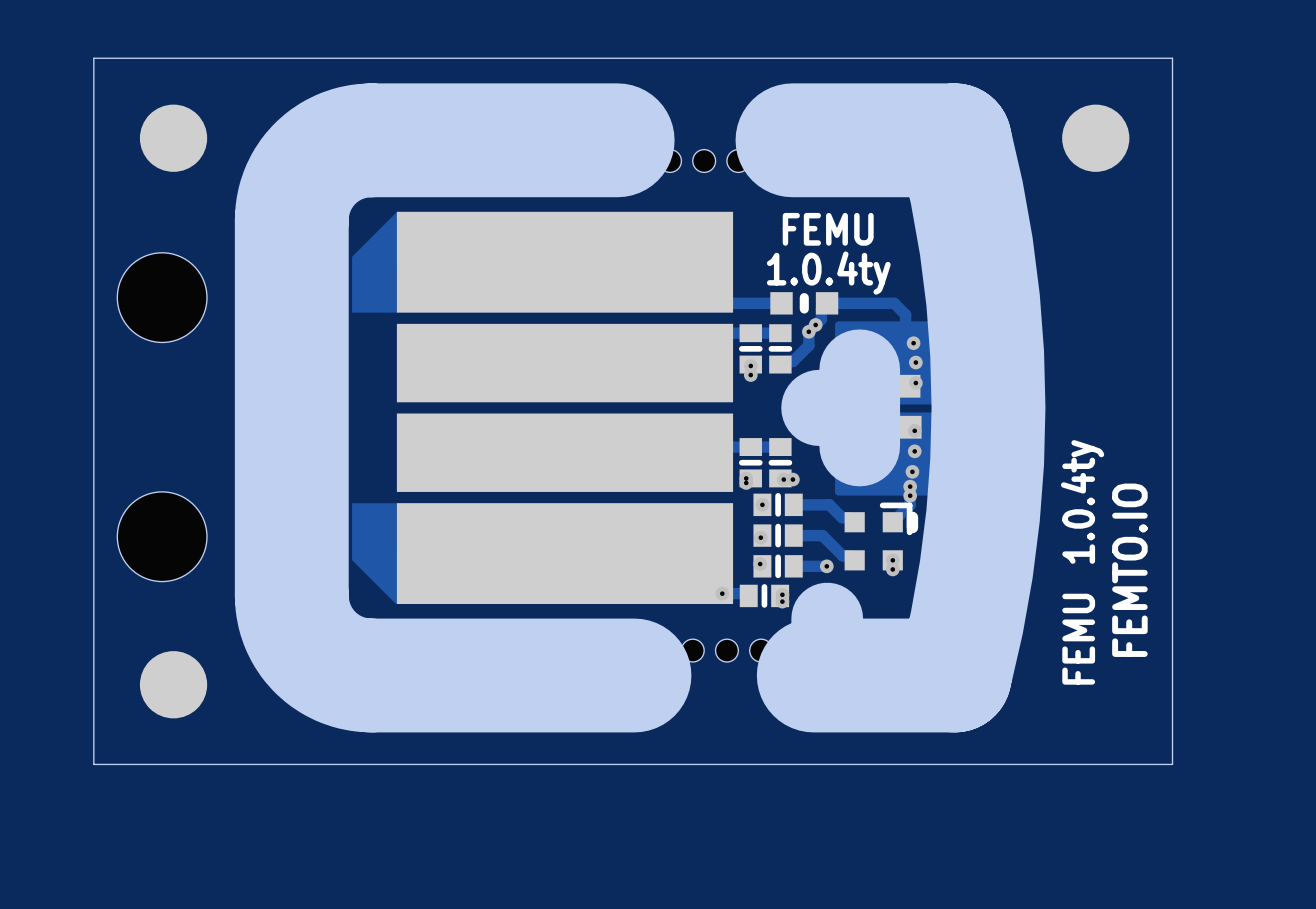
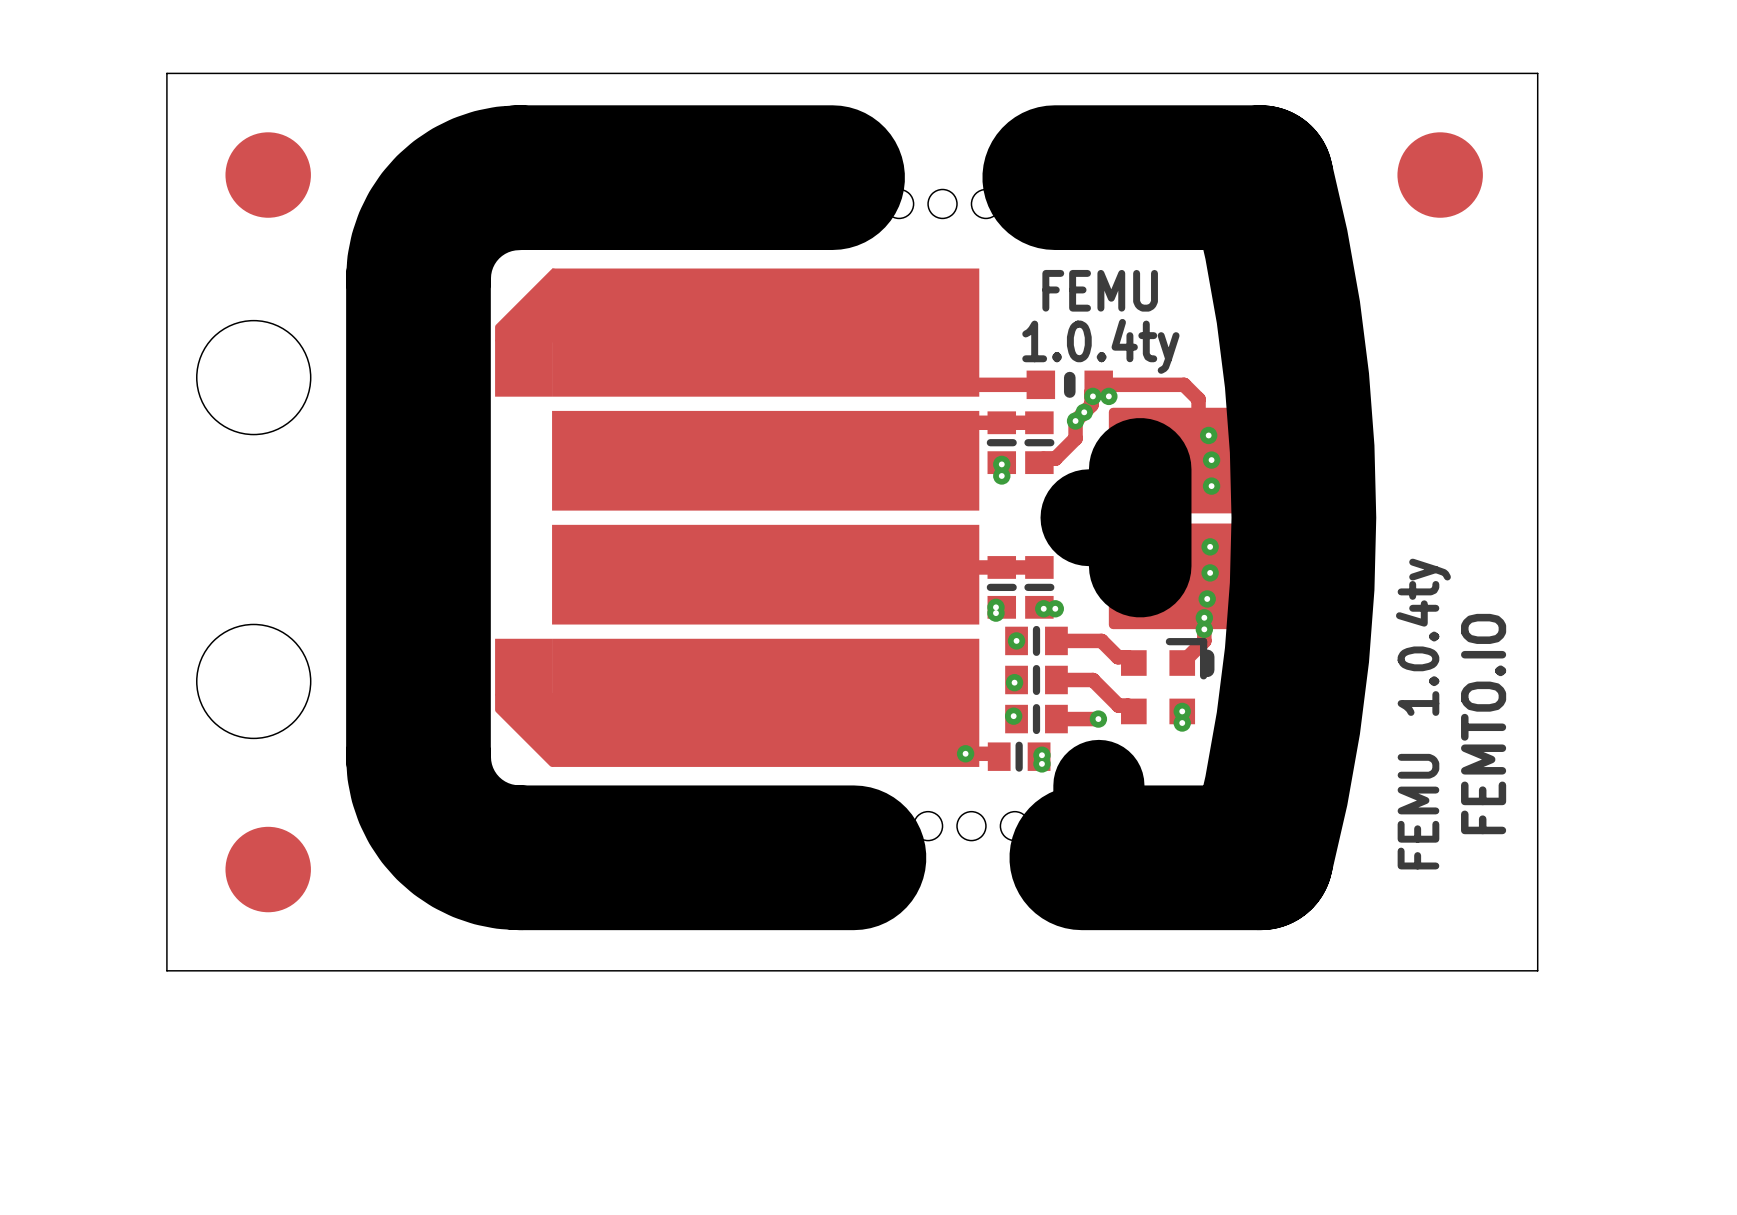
via: none -> (1092, 396)
via: none -> (1108, 396)

